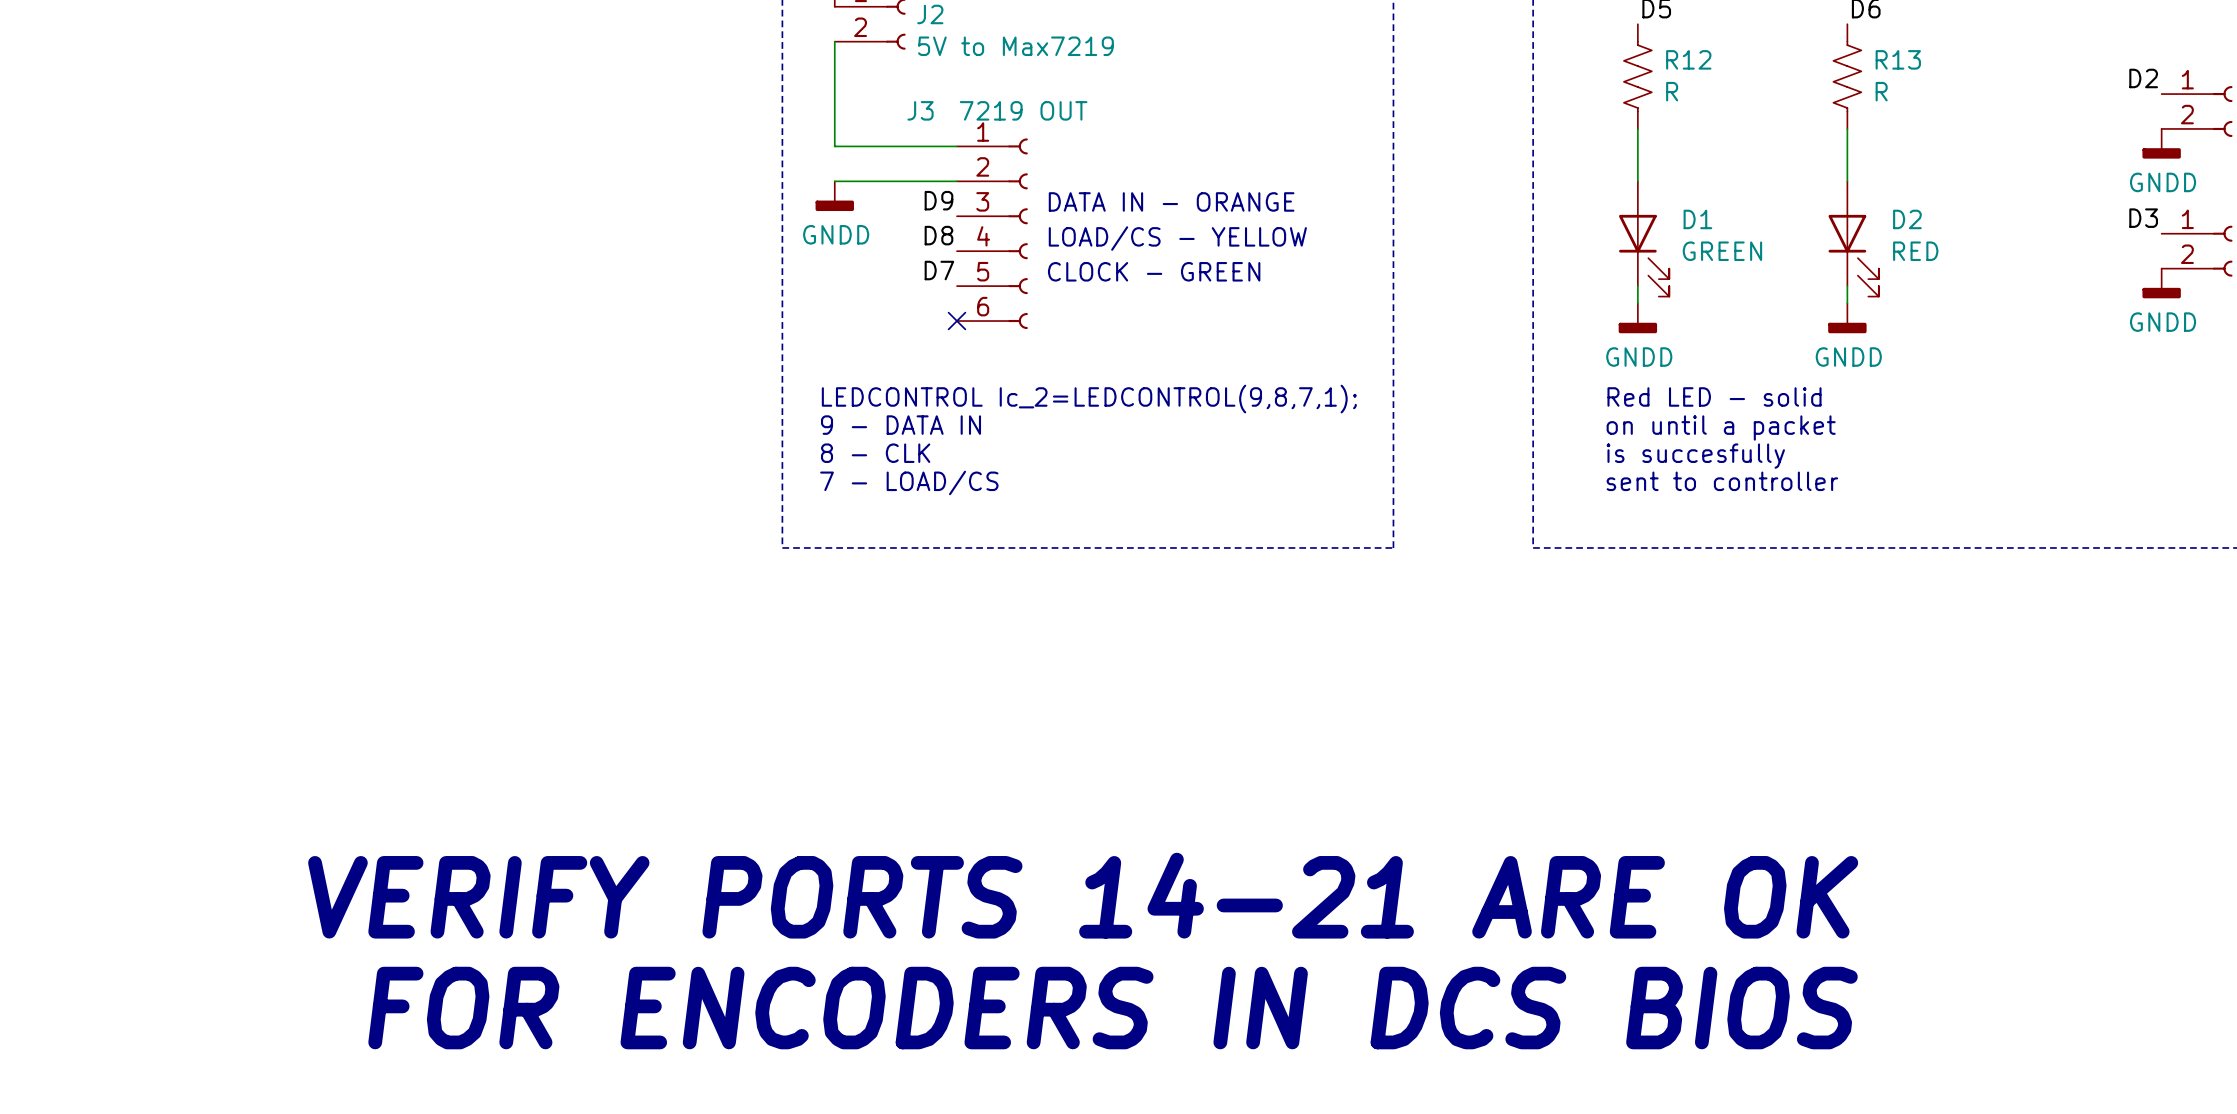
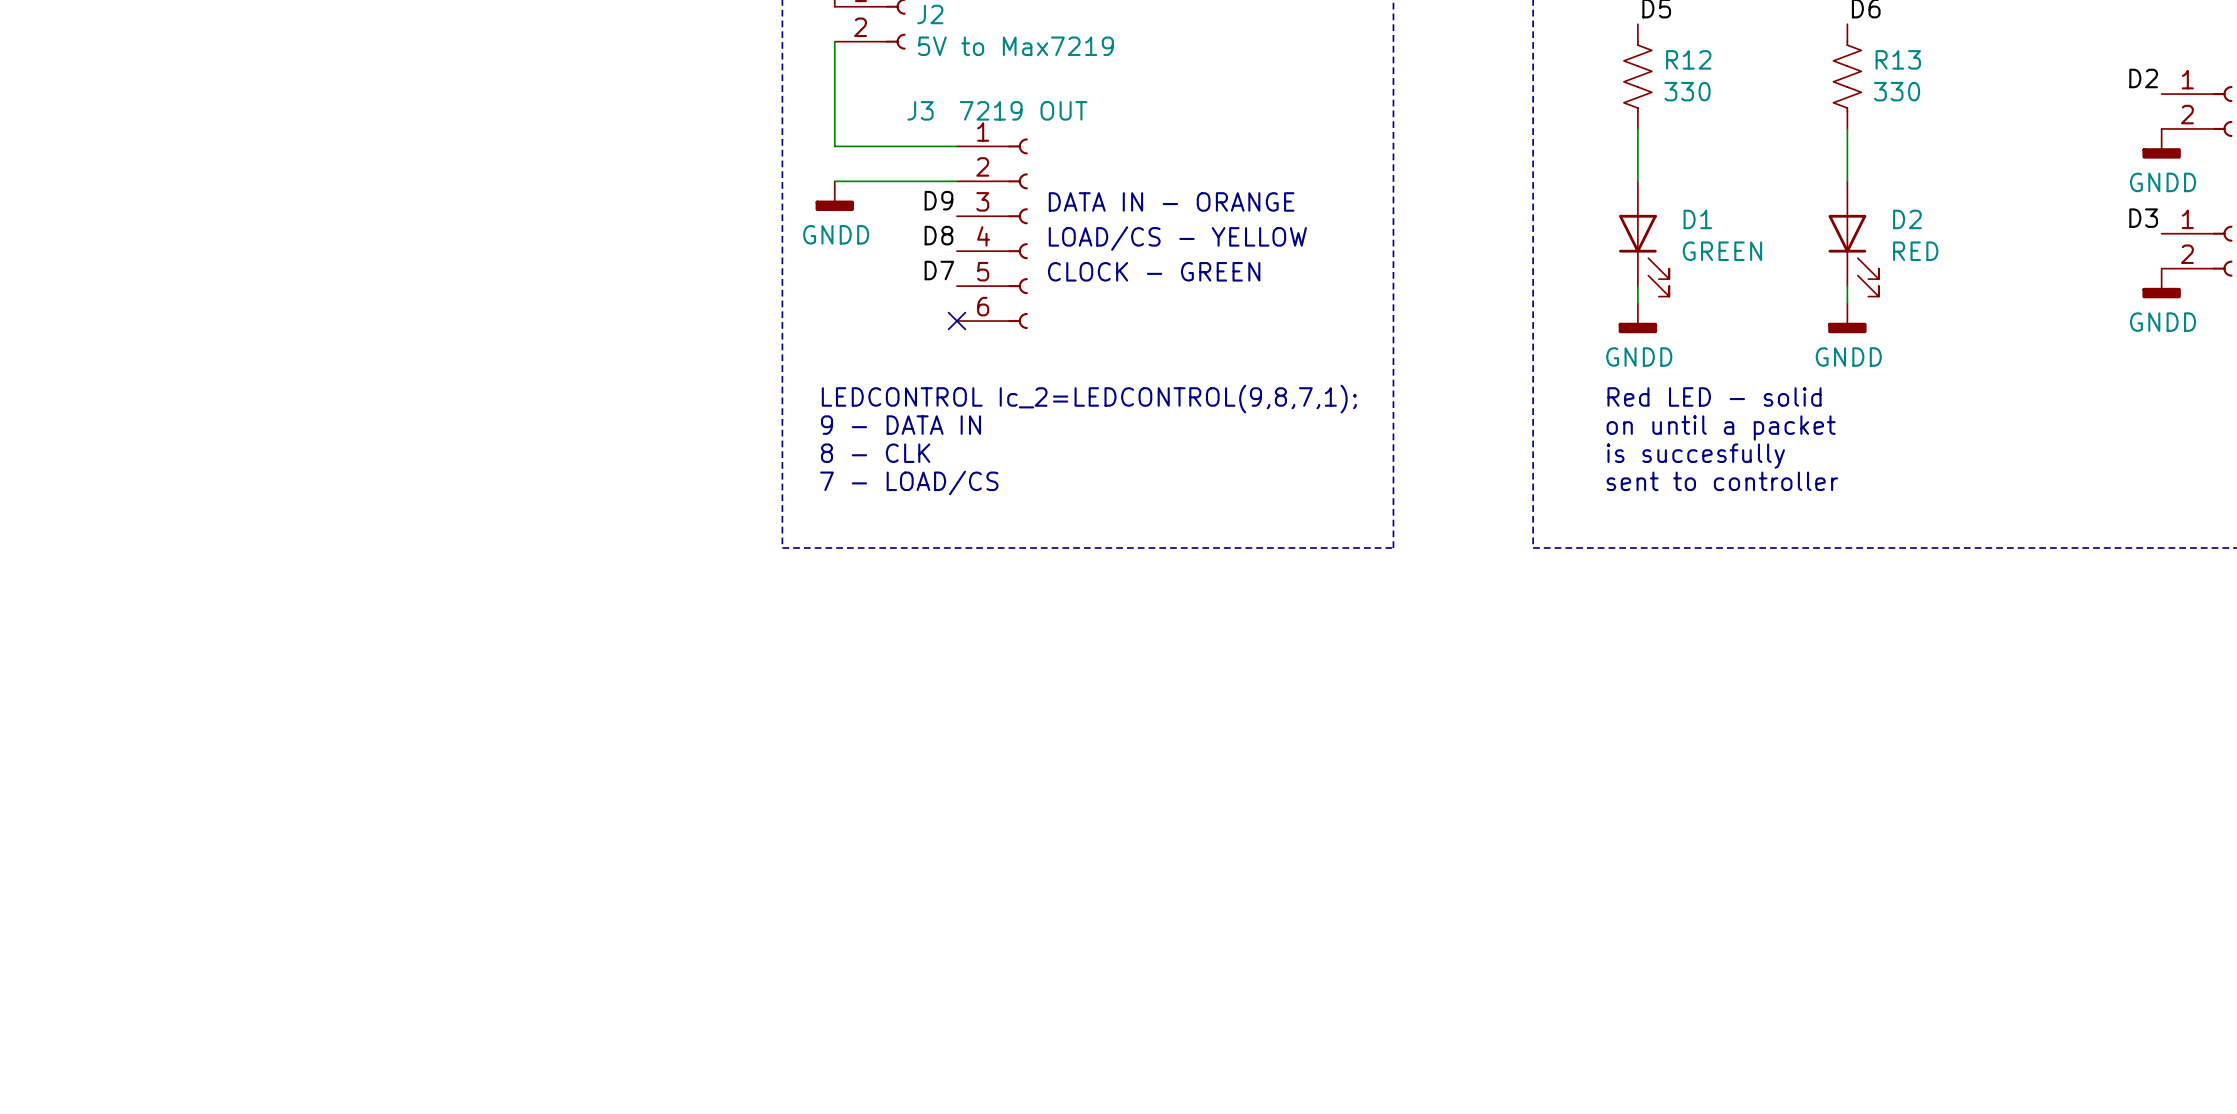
R12 value: R (1672, 91) -> 330 (1687, 91)
R13 value: R (1881, 91) -> 330 (1897, 91)
text: VERIFY PORTS 14-21 ARE OK (1083, 895) -> none
text: FOR ENCODERS IN DCS BIOS (1113, 1008) -> none

